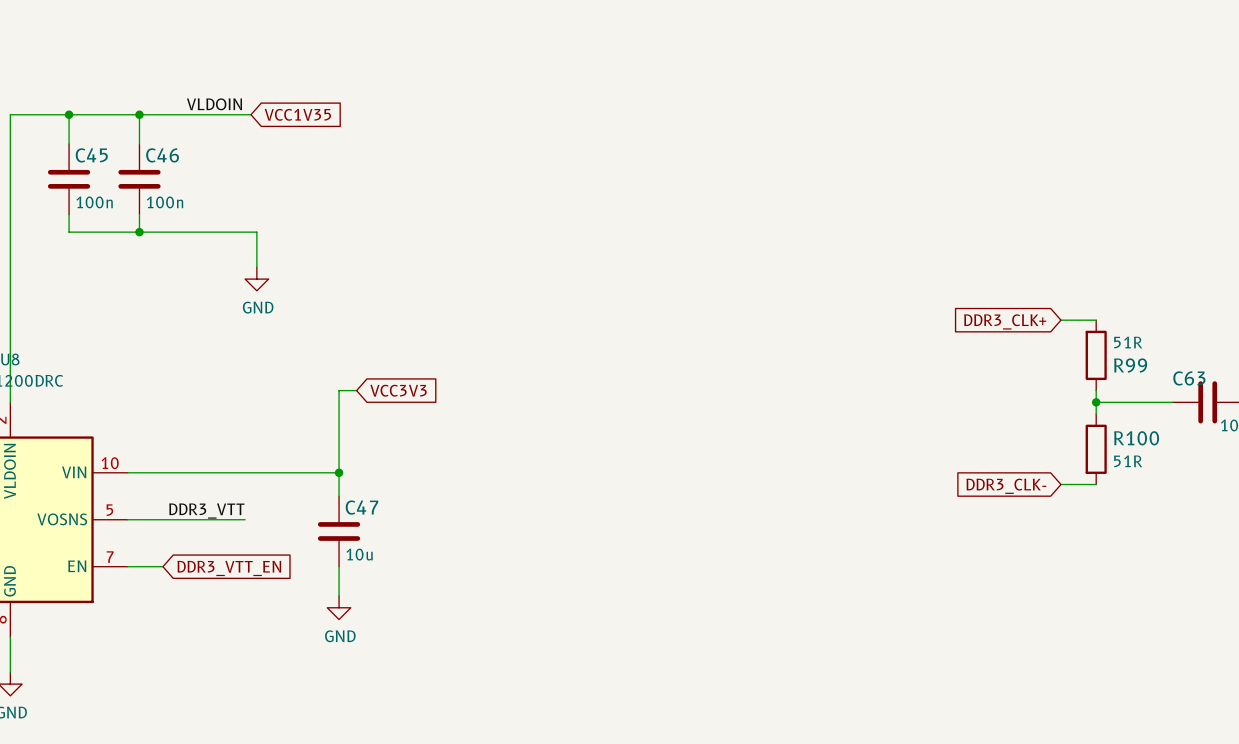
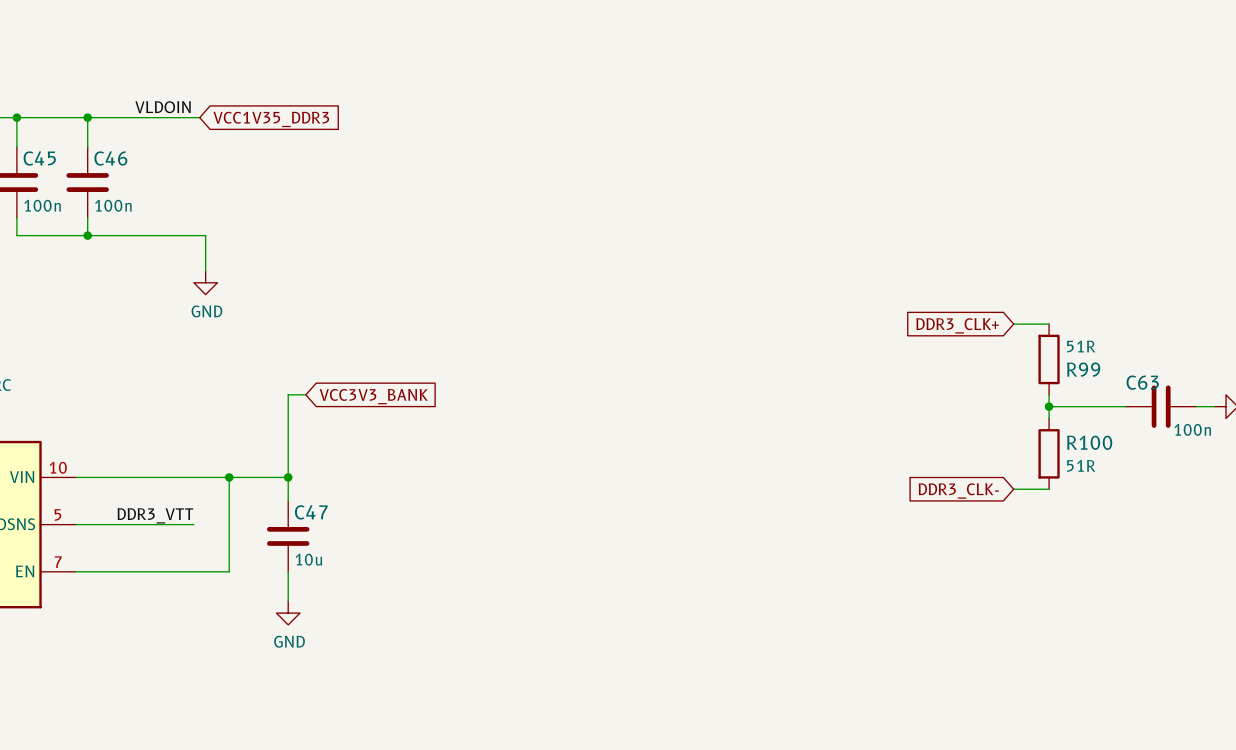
global label: VCC1V35 (297, 114) -> VCC1V35_DDR3 (271, 119)
global label: VCC3V3 (398, 390) -> VCC3V3_BANK (373, 396)
wire: none -> (229, 477) (229, 571) (111, 571)
junction: none -> (229, 477)
global label: DDR3_VTT_EN (229, 568) -> none

